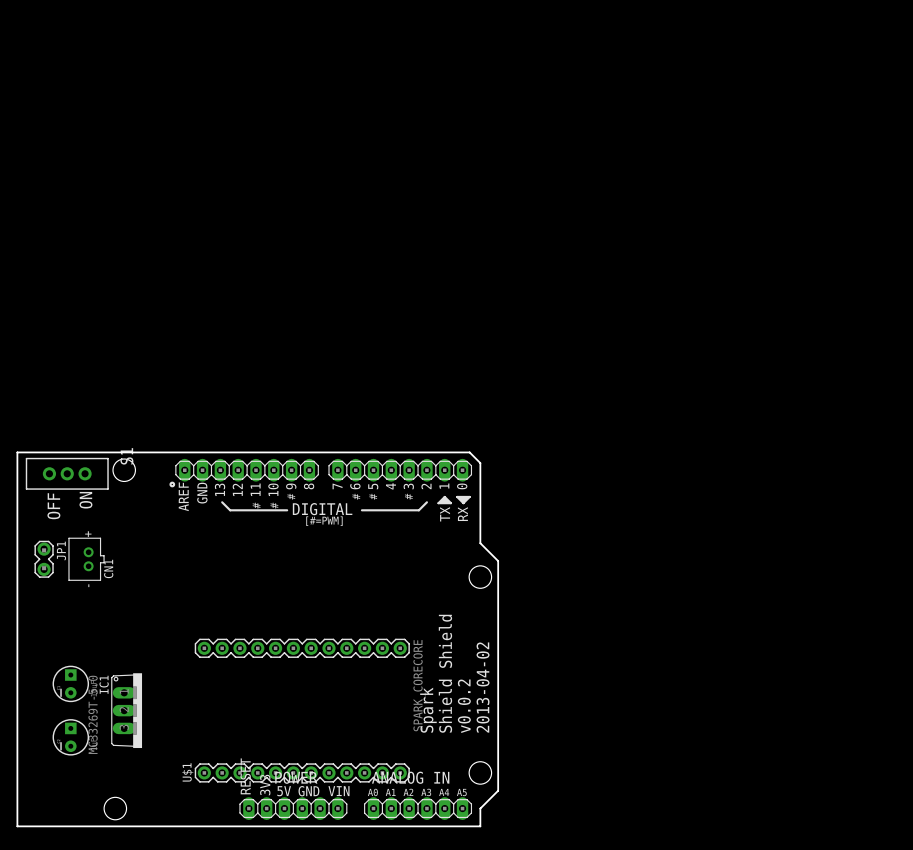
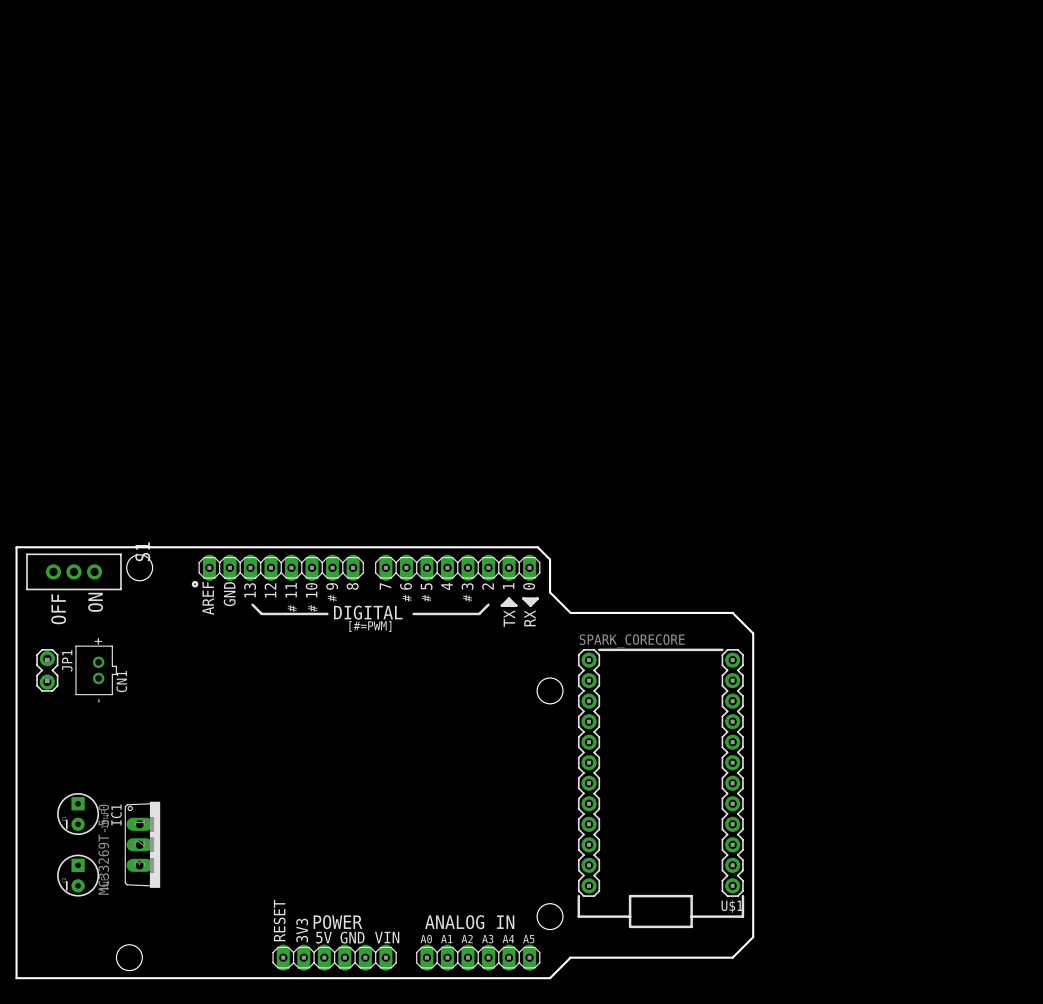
board edge: (480, 491) (480, 543) (498, 561) (498, 790) (480, 808) (480, 826) -> (550, 592) (570, 612) (732, 612) (753, 633) (753, 937) (732, 957) (570, 957) (550, 978)
U$1 footprint: [194, 638, 410, 783] -> [577, 648, 745, 929]
text: Shield Shield (445, 673) -> none
U$1 value position: SPARK_CORECORE (419, 685) -> SPARK_CORECORE (632, 641)
text: 2013-04-02 (483, 687) -> none
text: v0.0.2 (464, 706) -> none
text: Spark (428, 710) -> none
U$1 name position: U$1 (187, 772) -> U$1 (732, 906)

